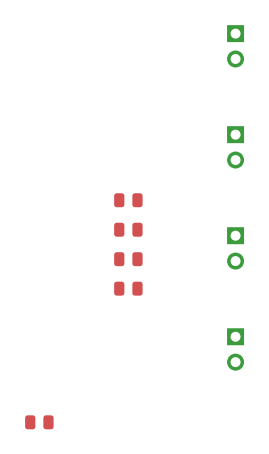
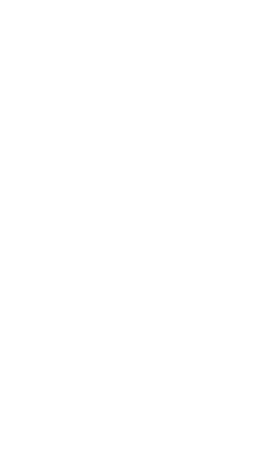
part: (235, 46) -> none
part: (235, 147) -> none
part: (128, 200) -> none
part: (128, 229) -> none
part: (235, 248) -> none
part: (128, 259) -> none
part: (128, 288) -> none
part: (235, 349) -> none
part: (39, 422) -> none

